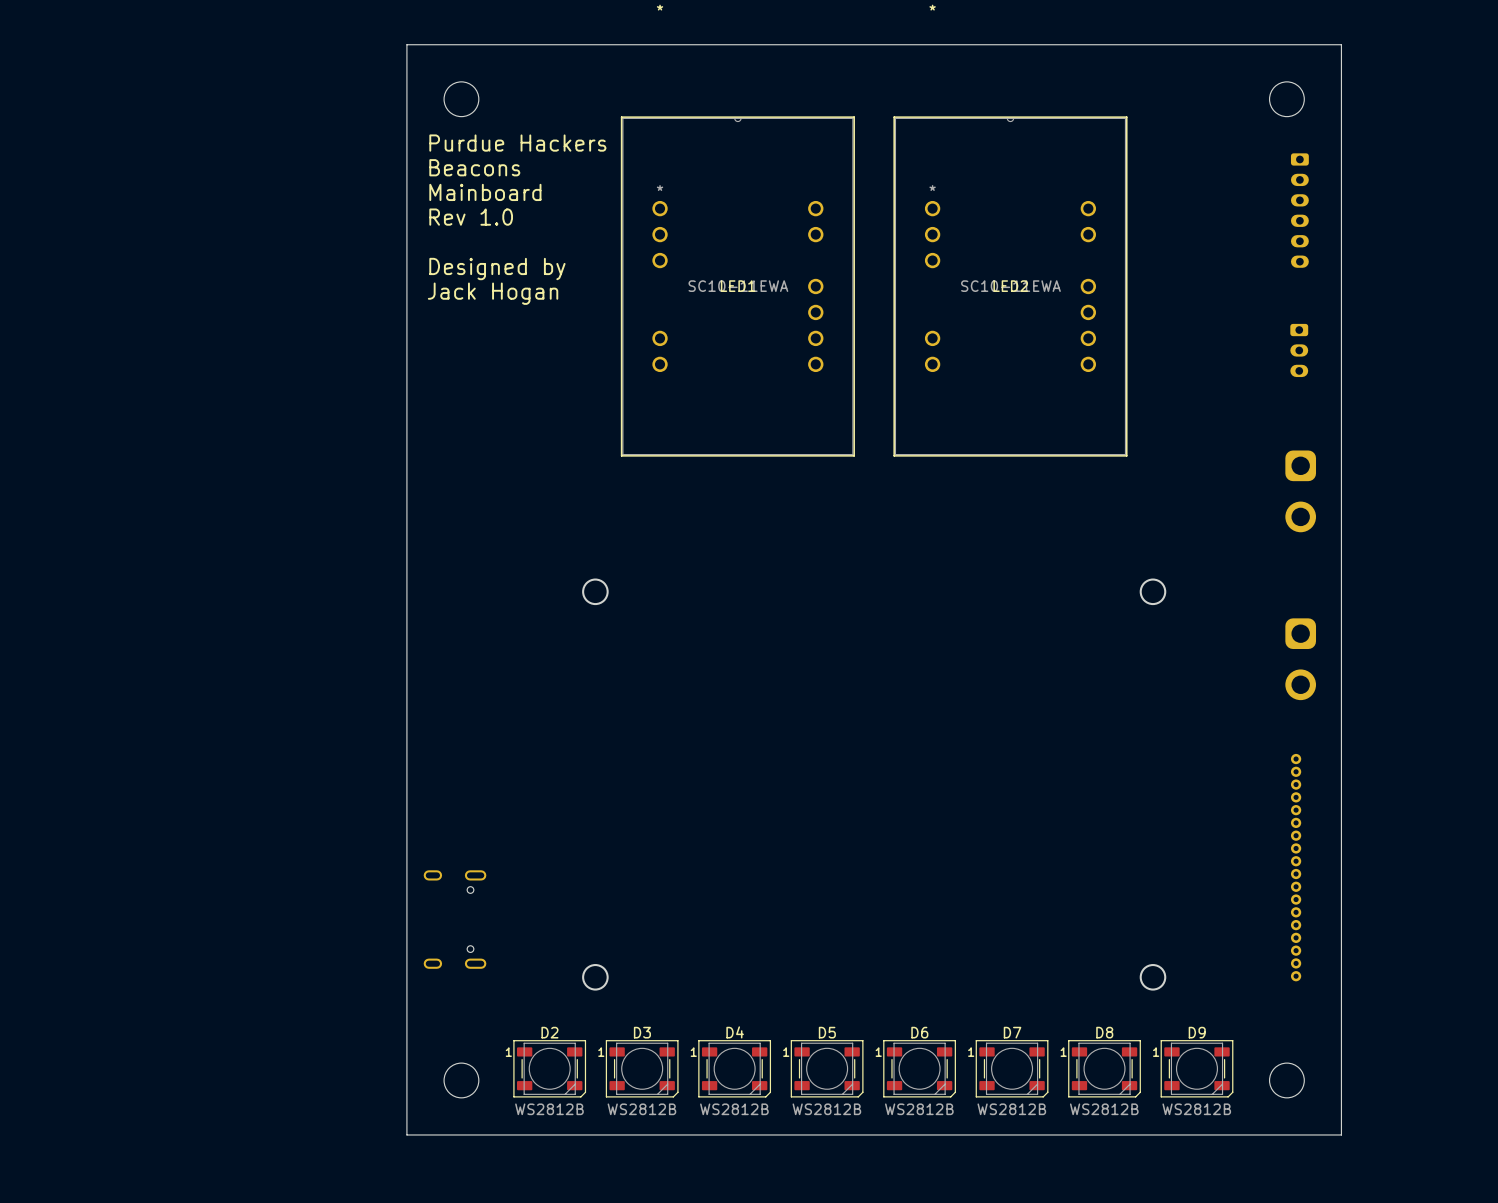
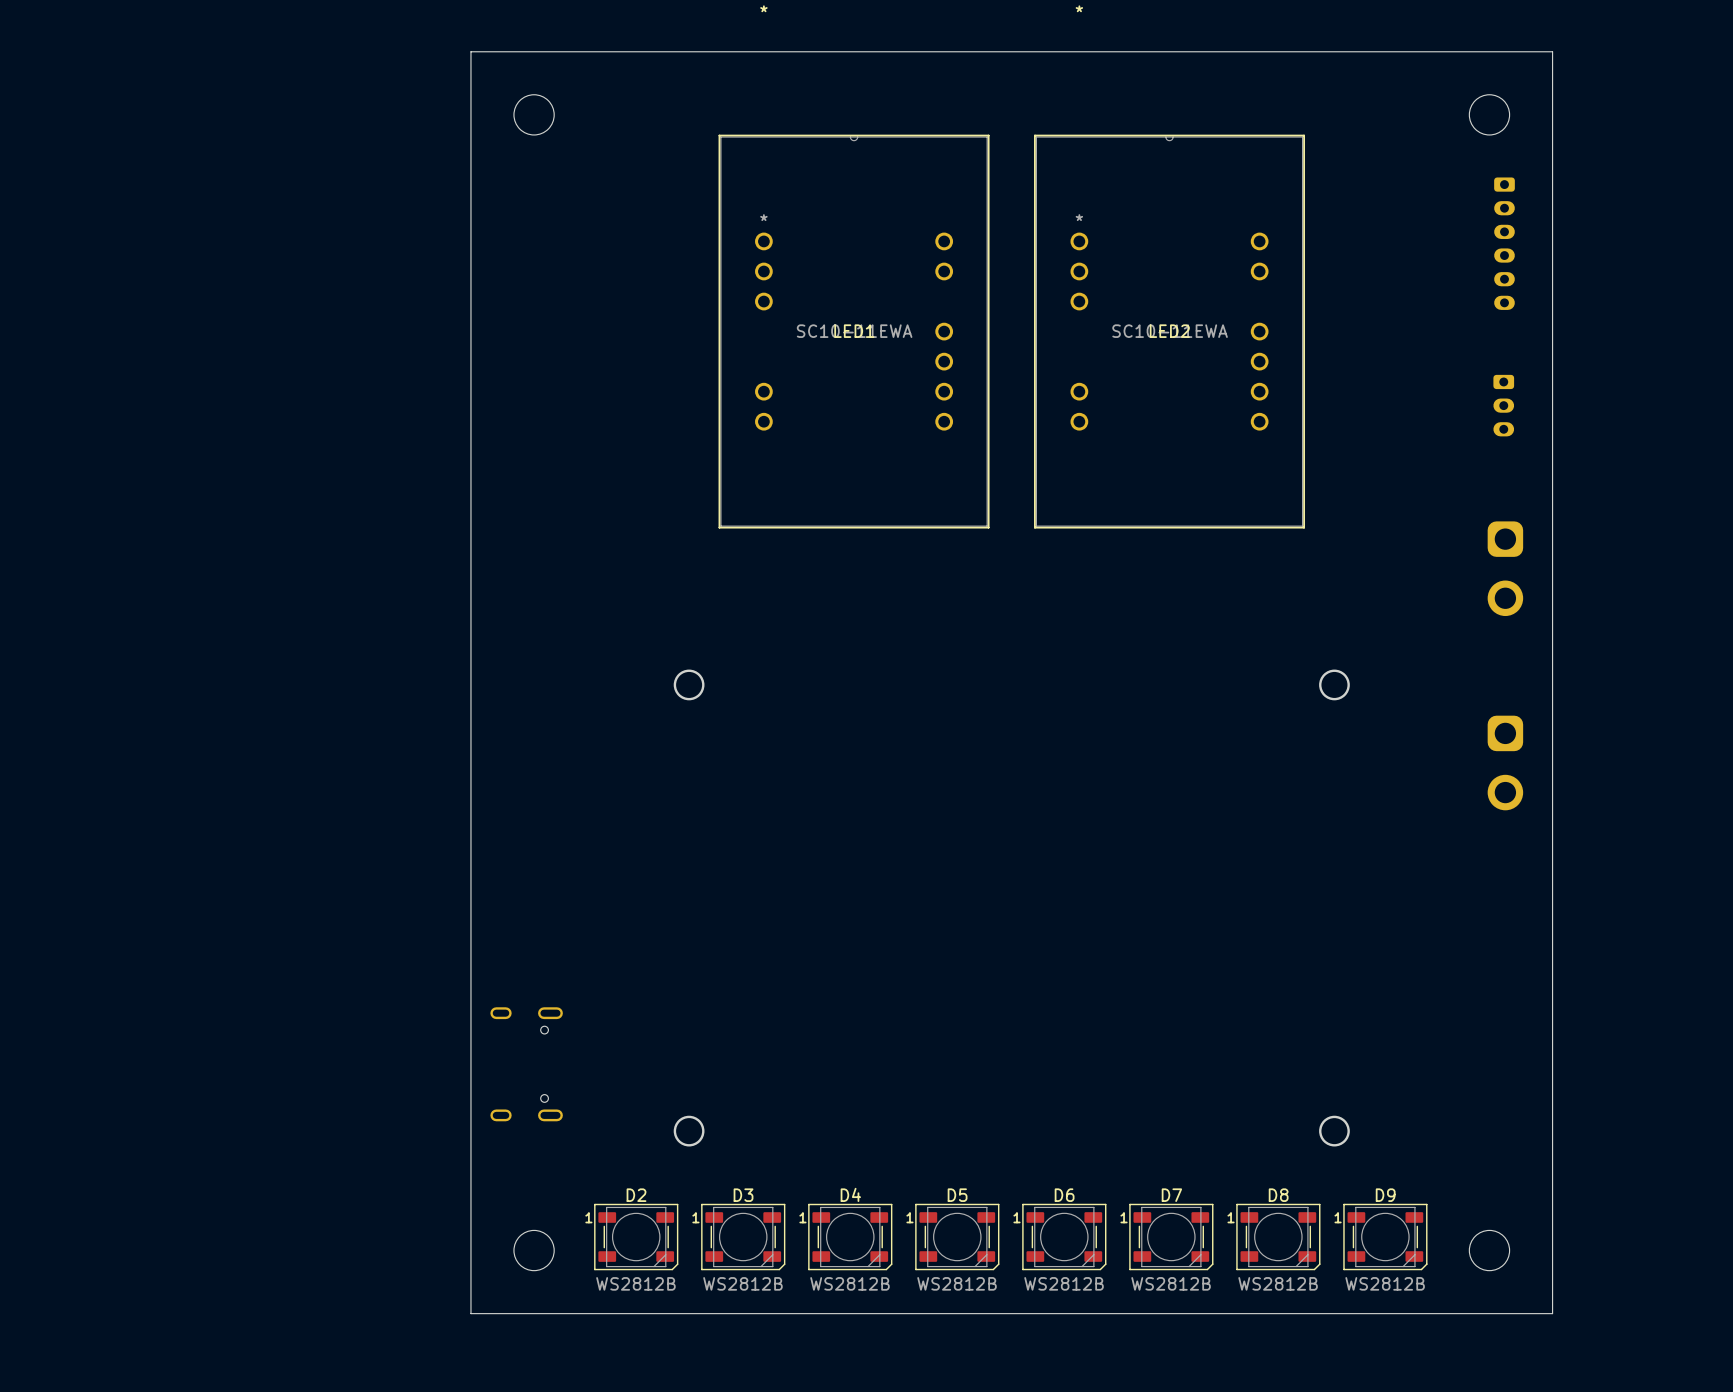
text: Purdue Hackers (517, 143) -> none
text: Beacons (474, 167) -> none
text: Mainboard (485, 192) -> none
text: Rev 1.0 (471, 217) -> none
text: Designed by (497, 269) -> none
text: Jack Hogan (493, 293) -> none
part: (1296, 867) -> none

